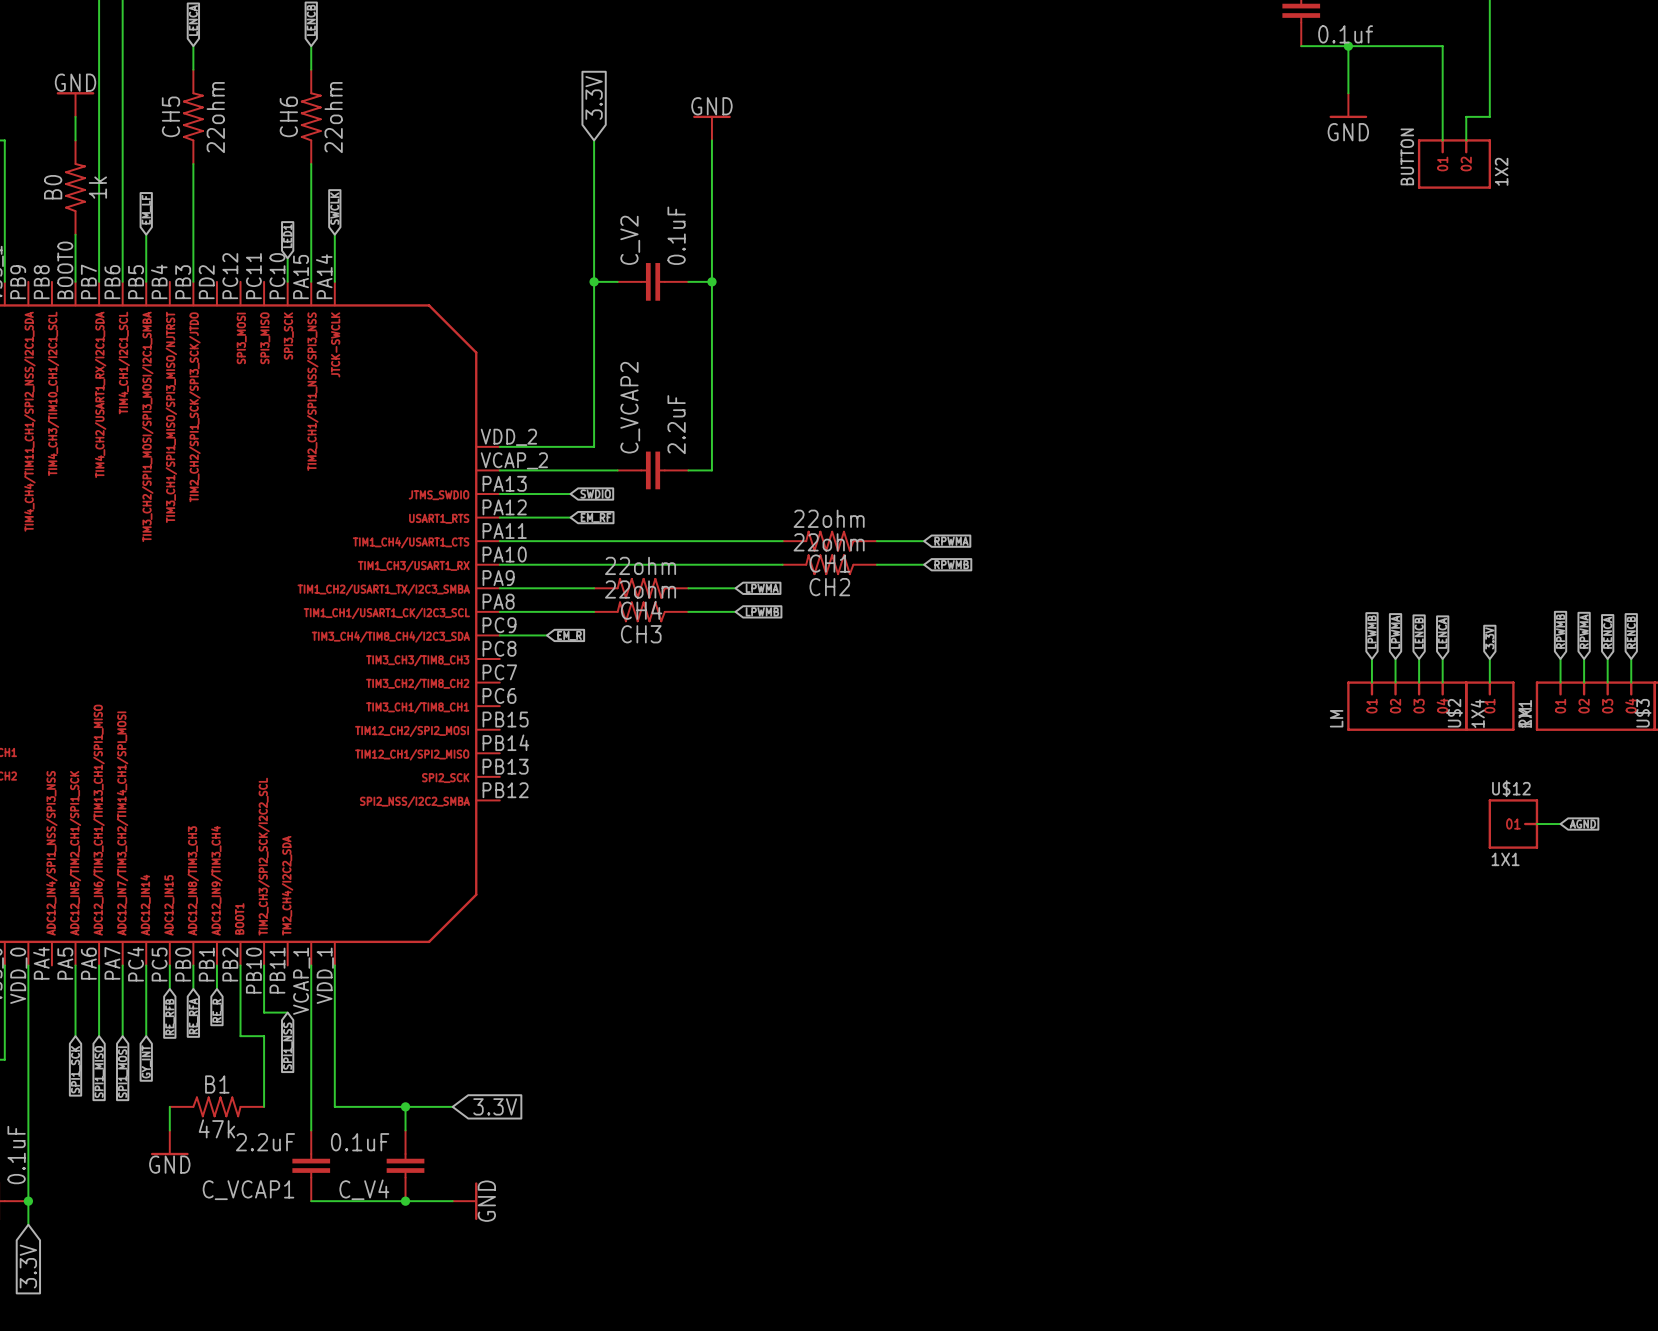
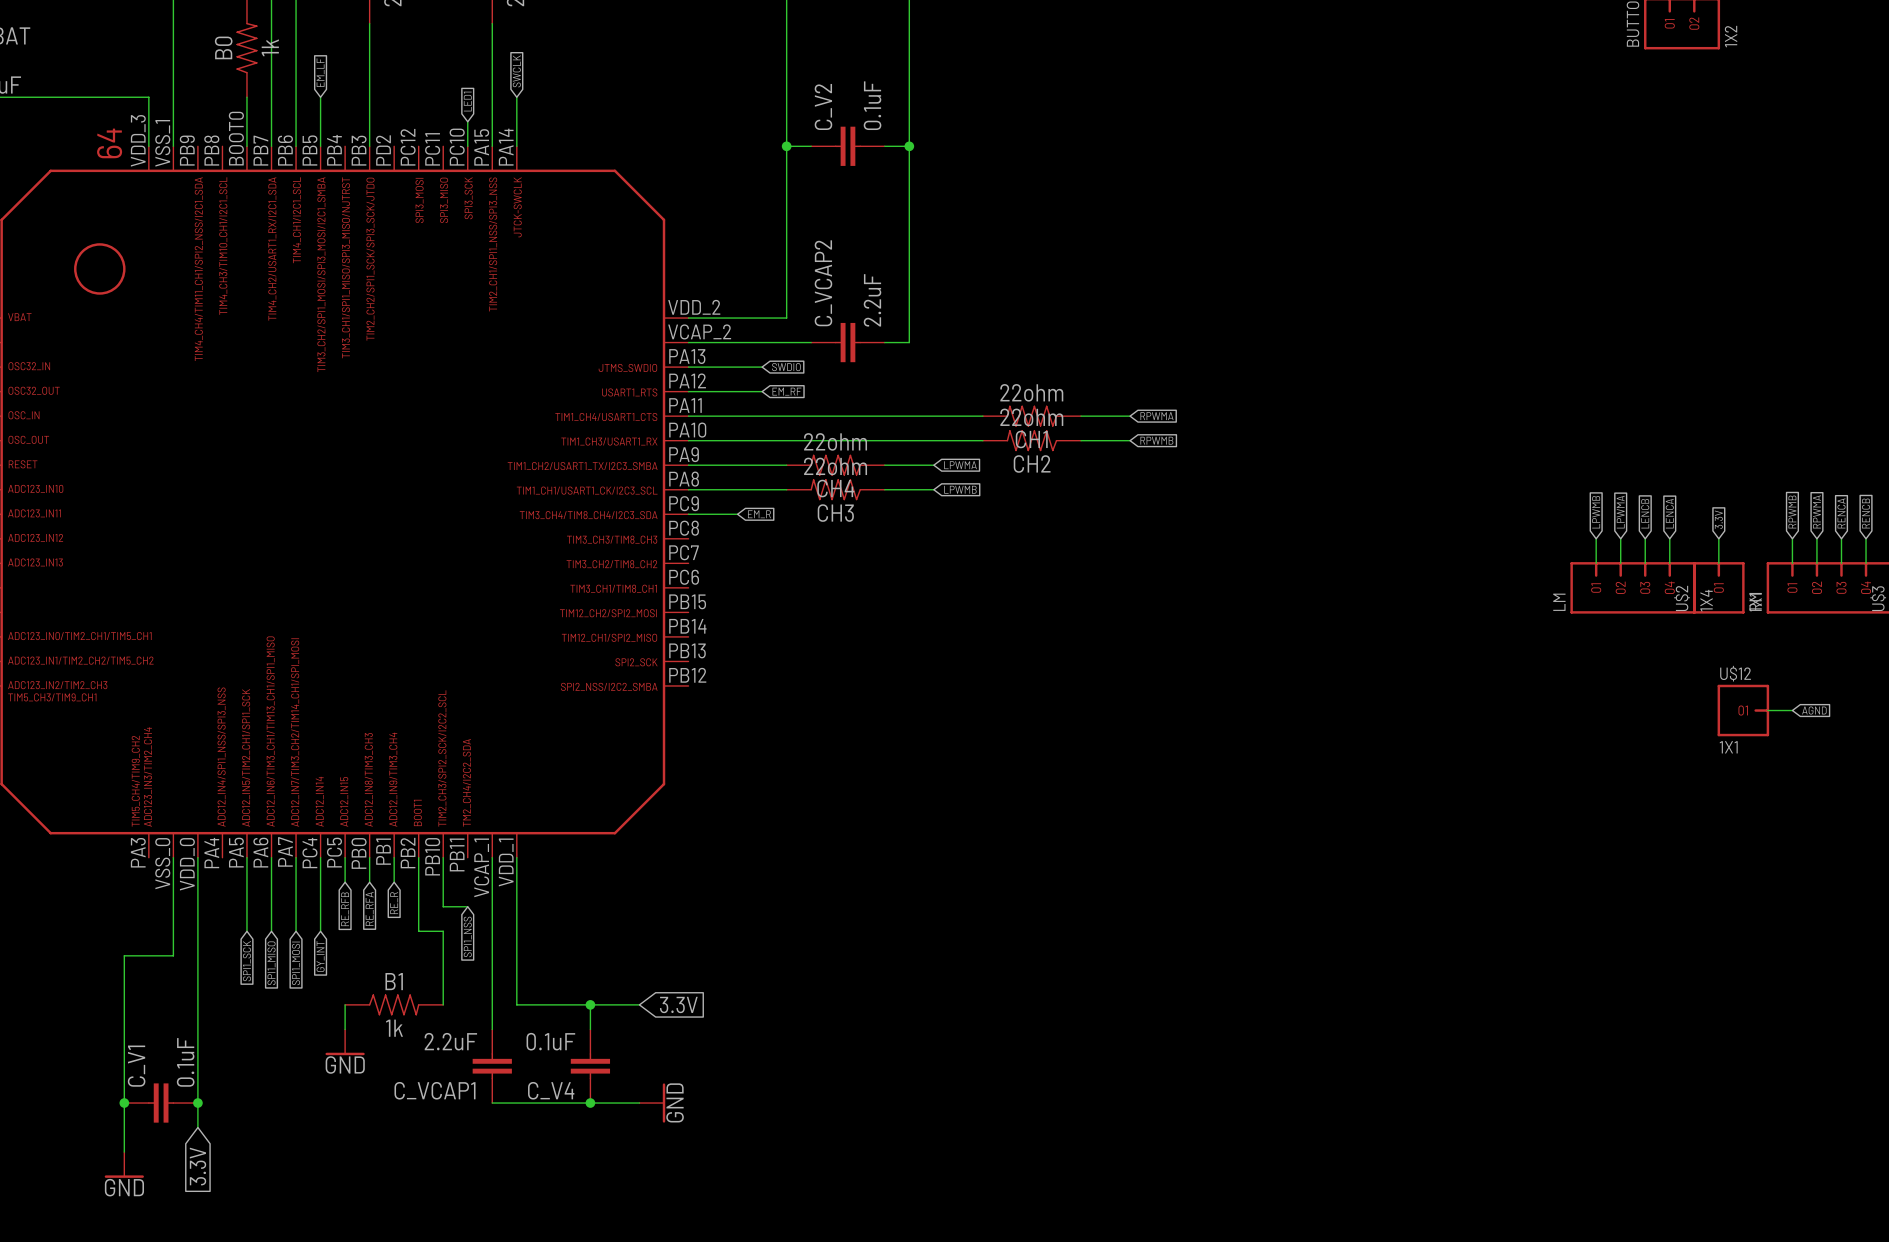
B1 value: 47k (216, 1128) -> 1k (394, 1028)

